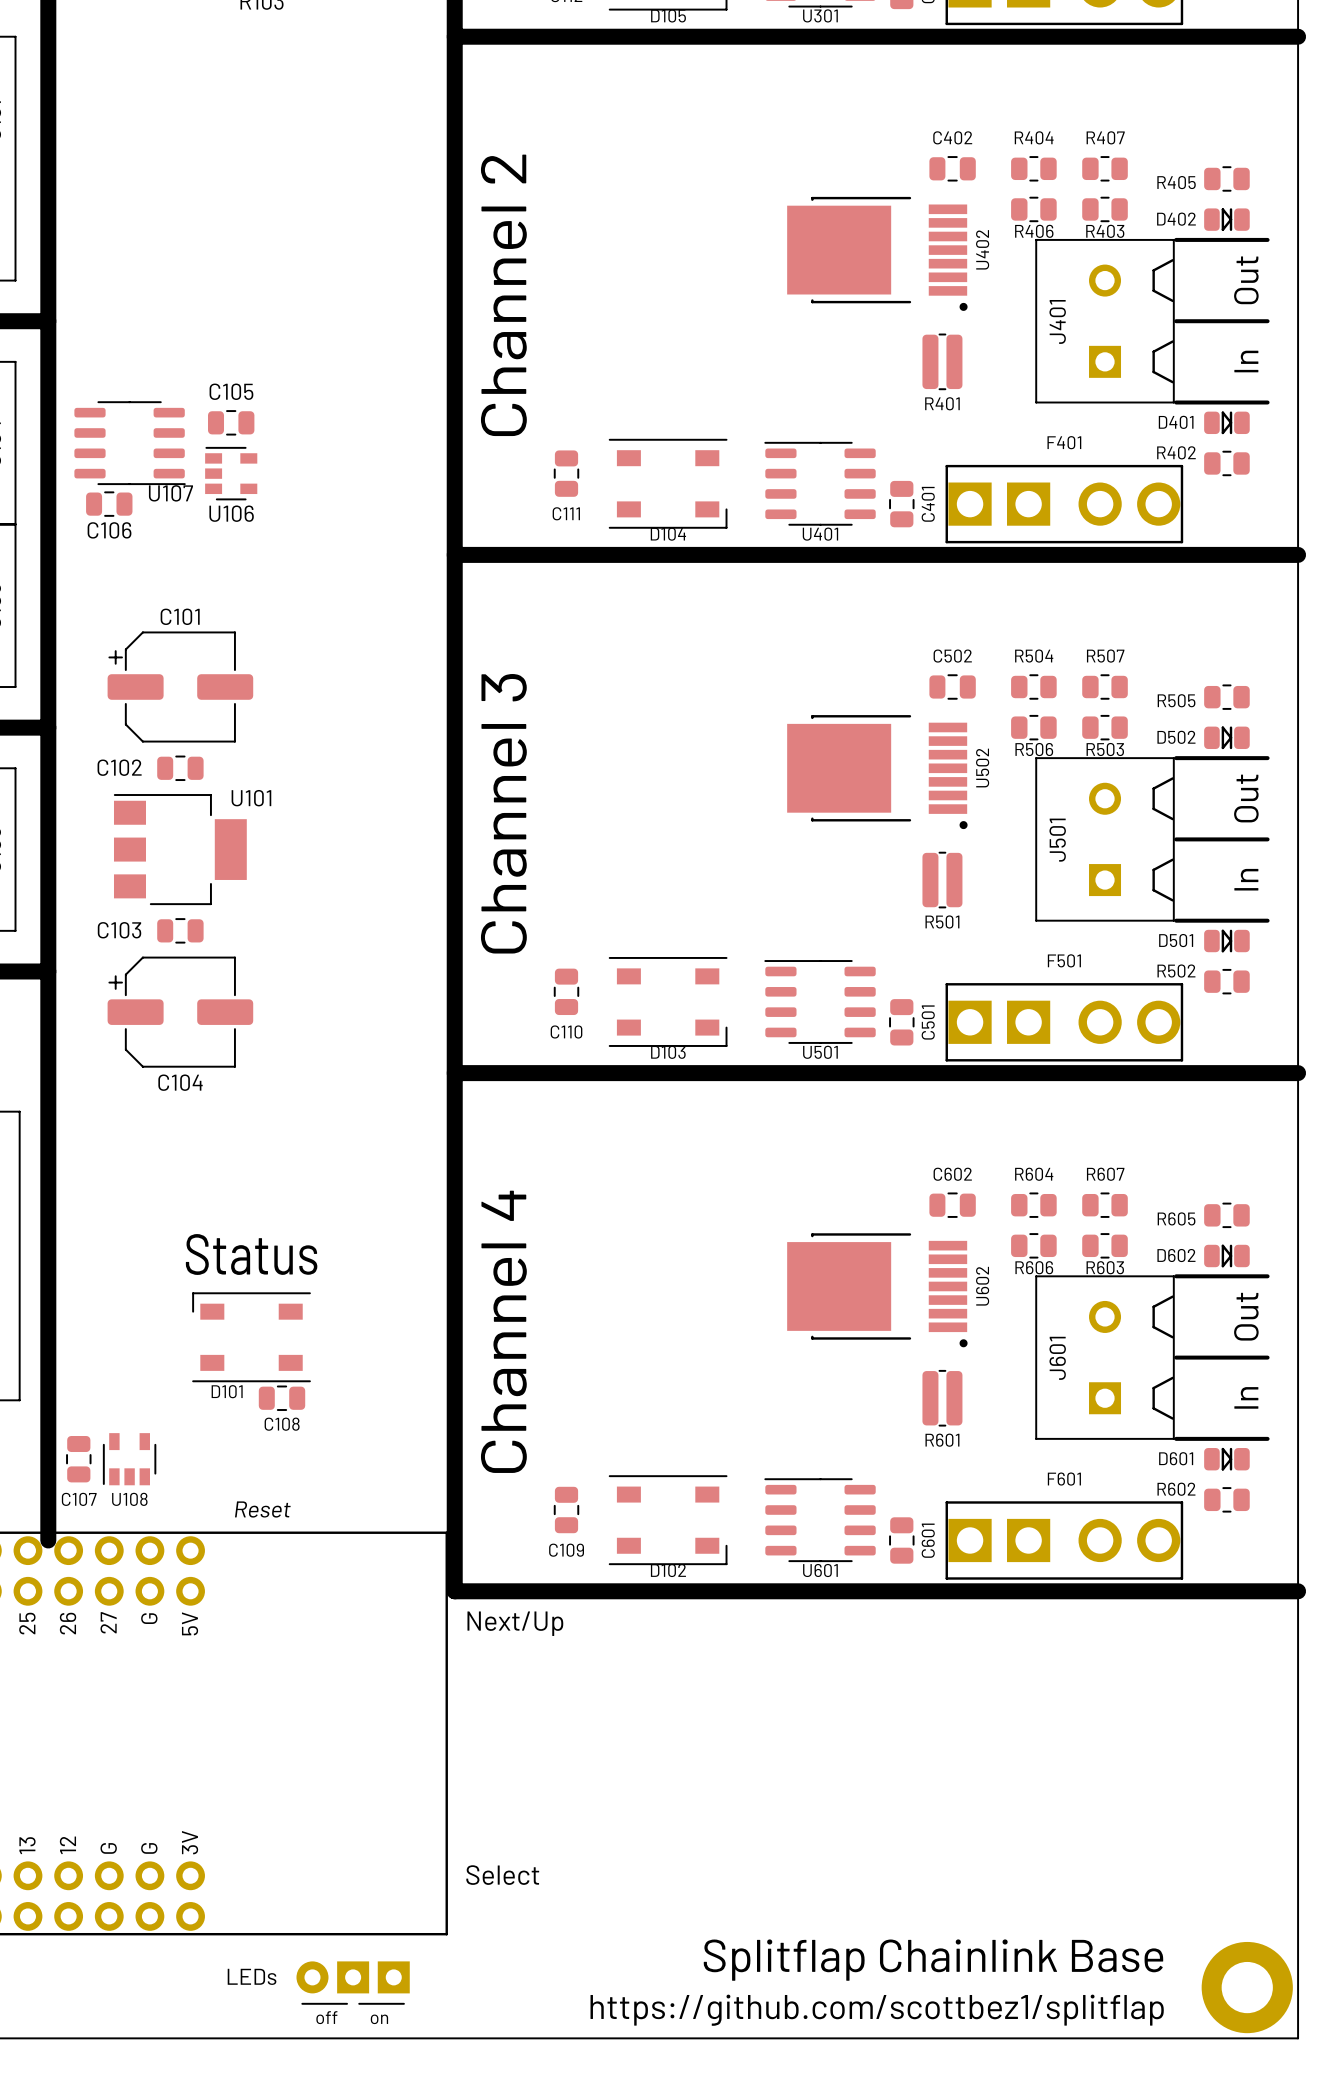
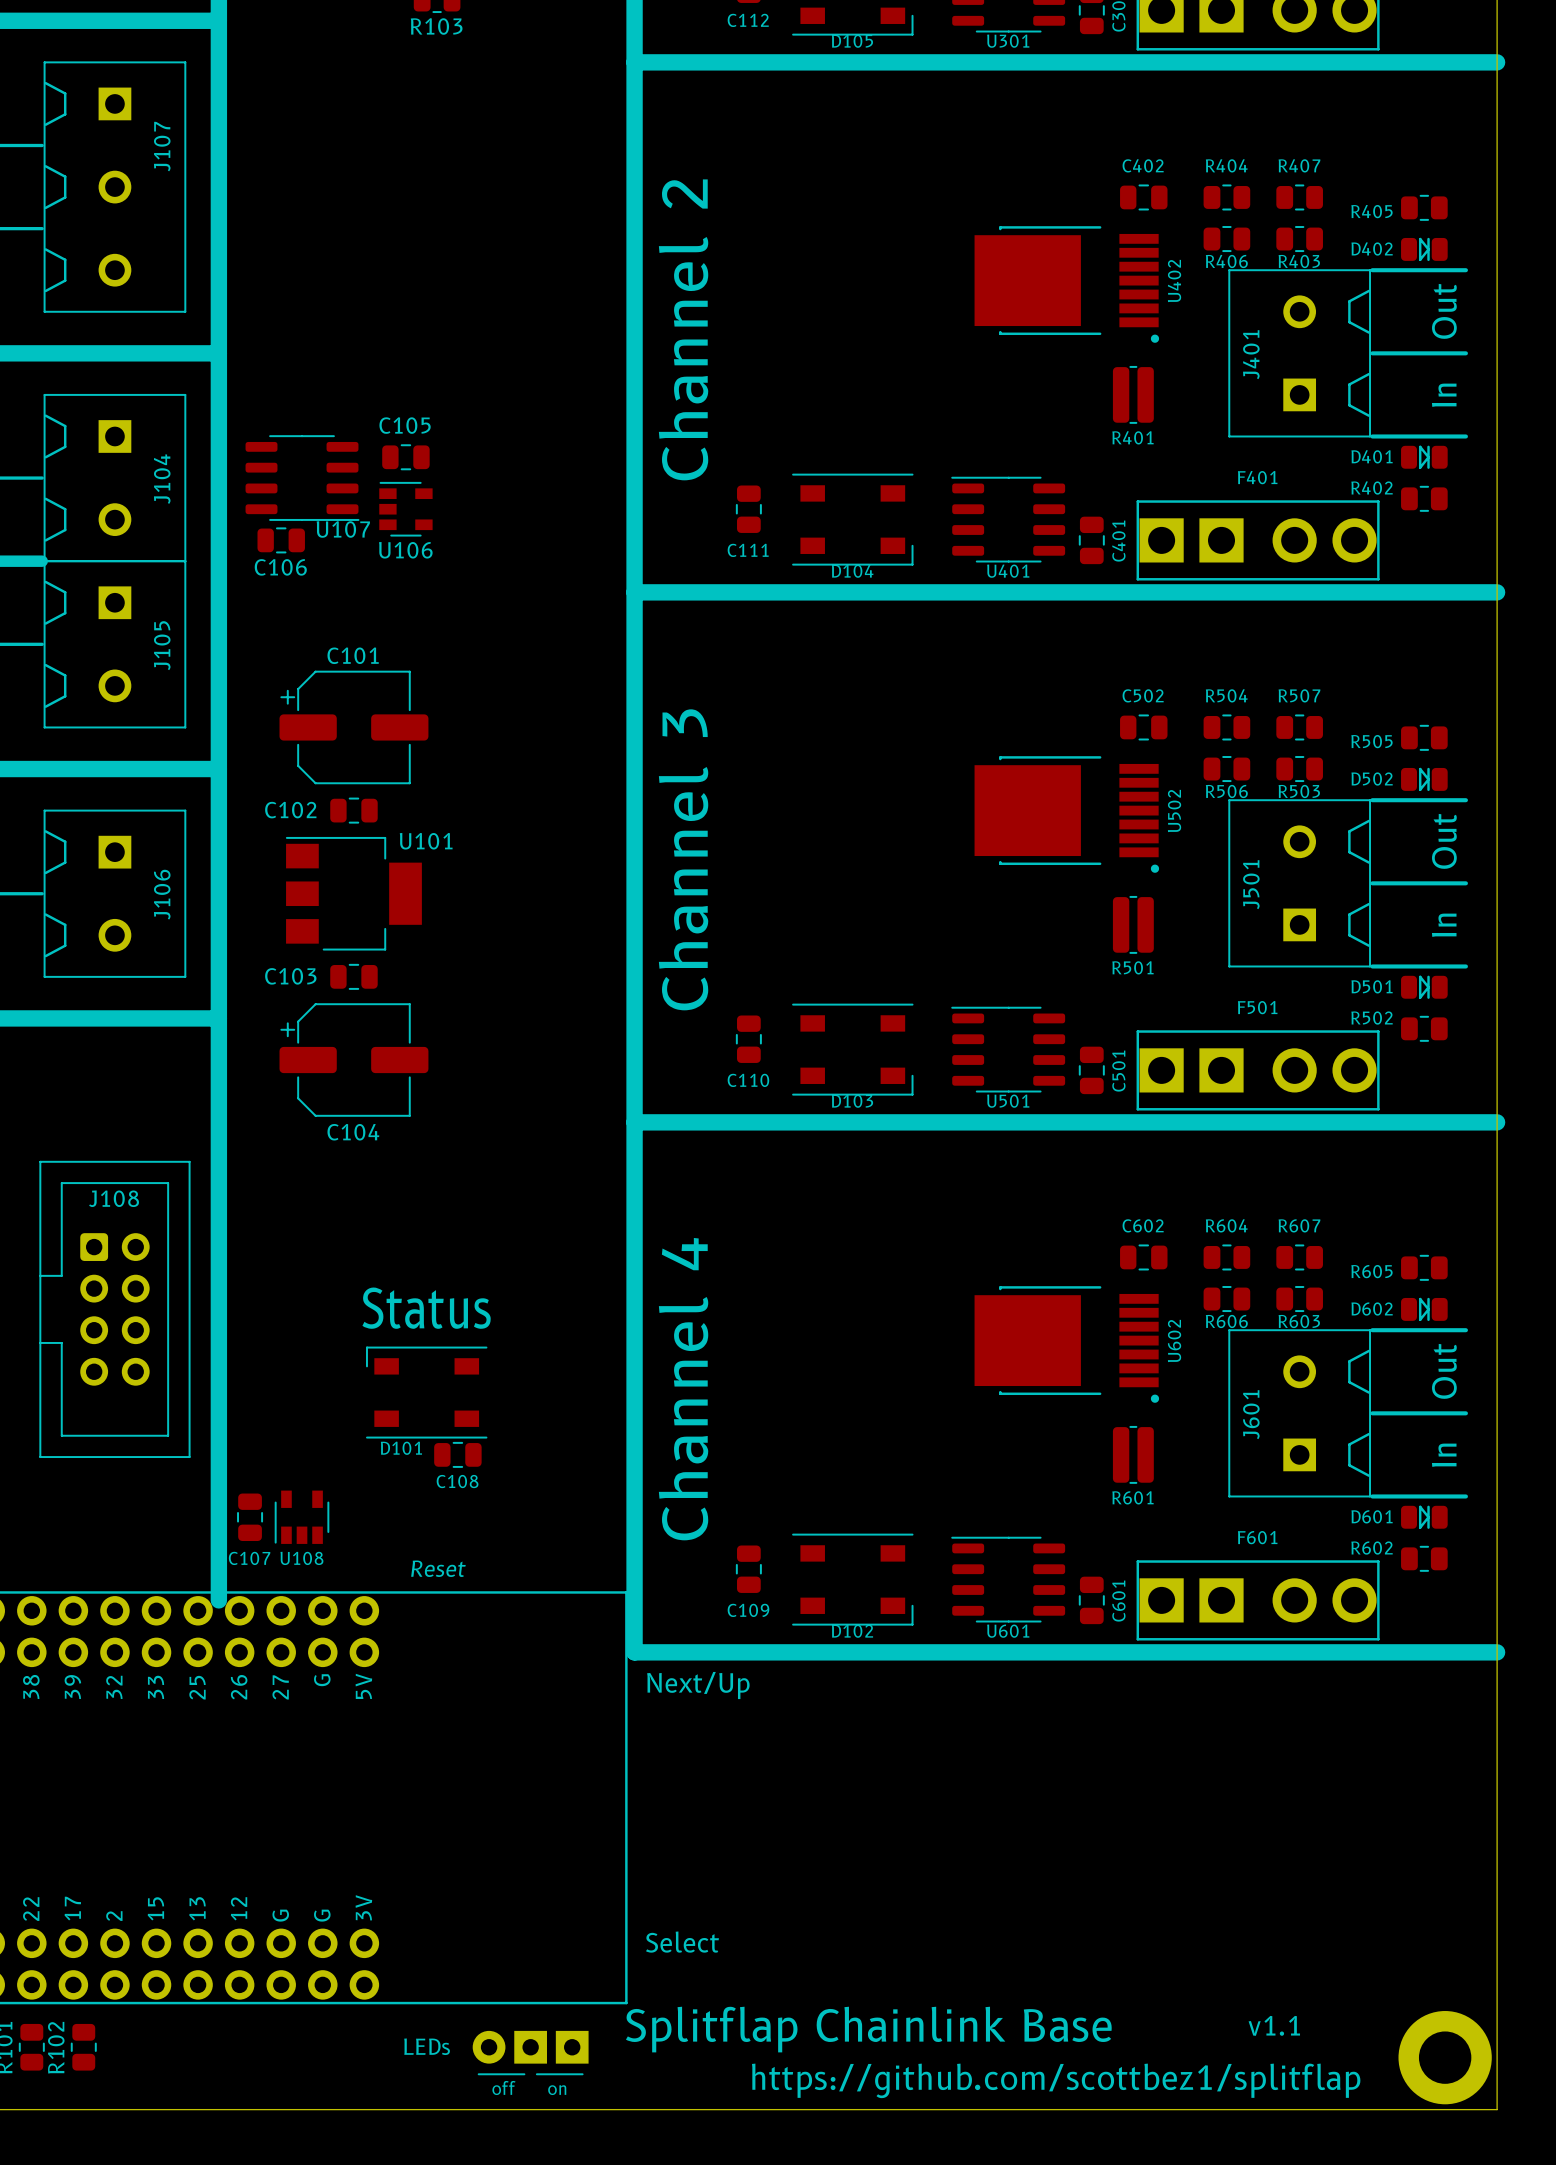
text: none -> v1.1 (1274, 2025)
text: none -> Splitflap Chainlink Base (868, 2029)
text: Splitflap Chainlink Base (933, 1960) -> none

